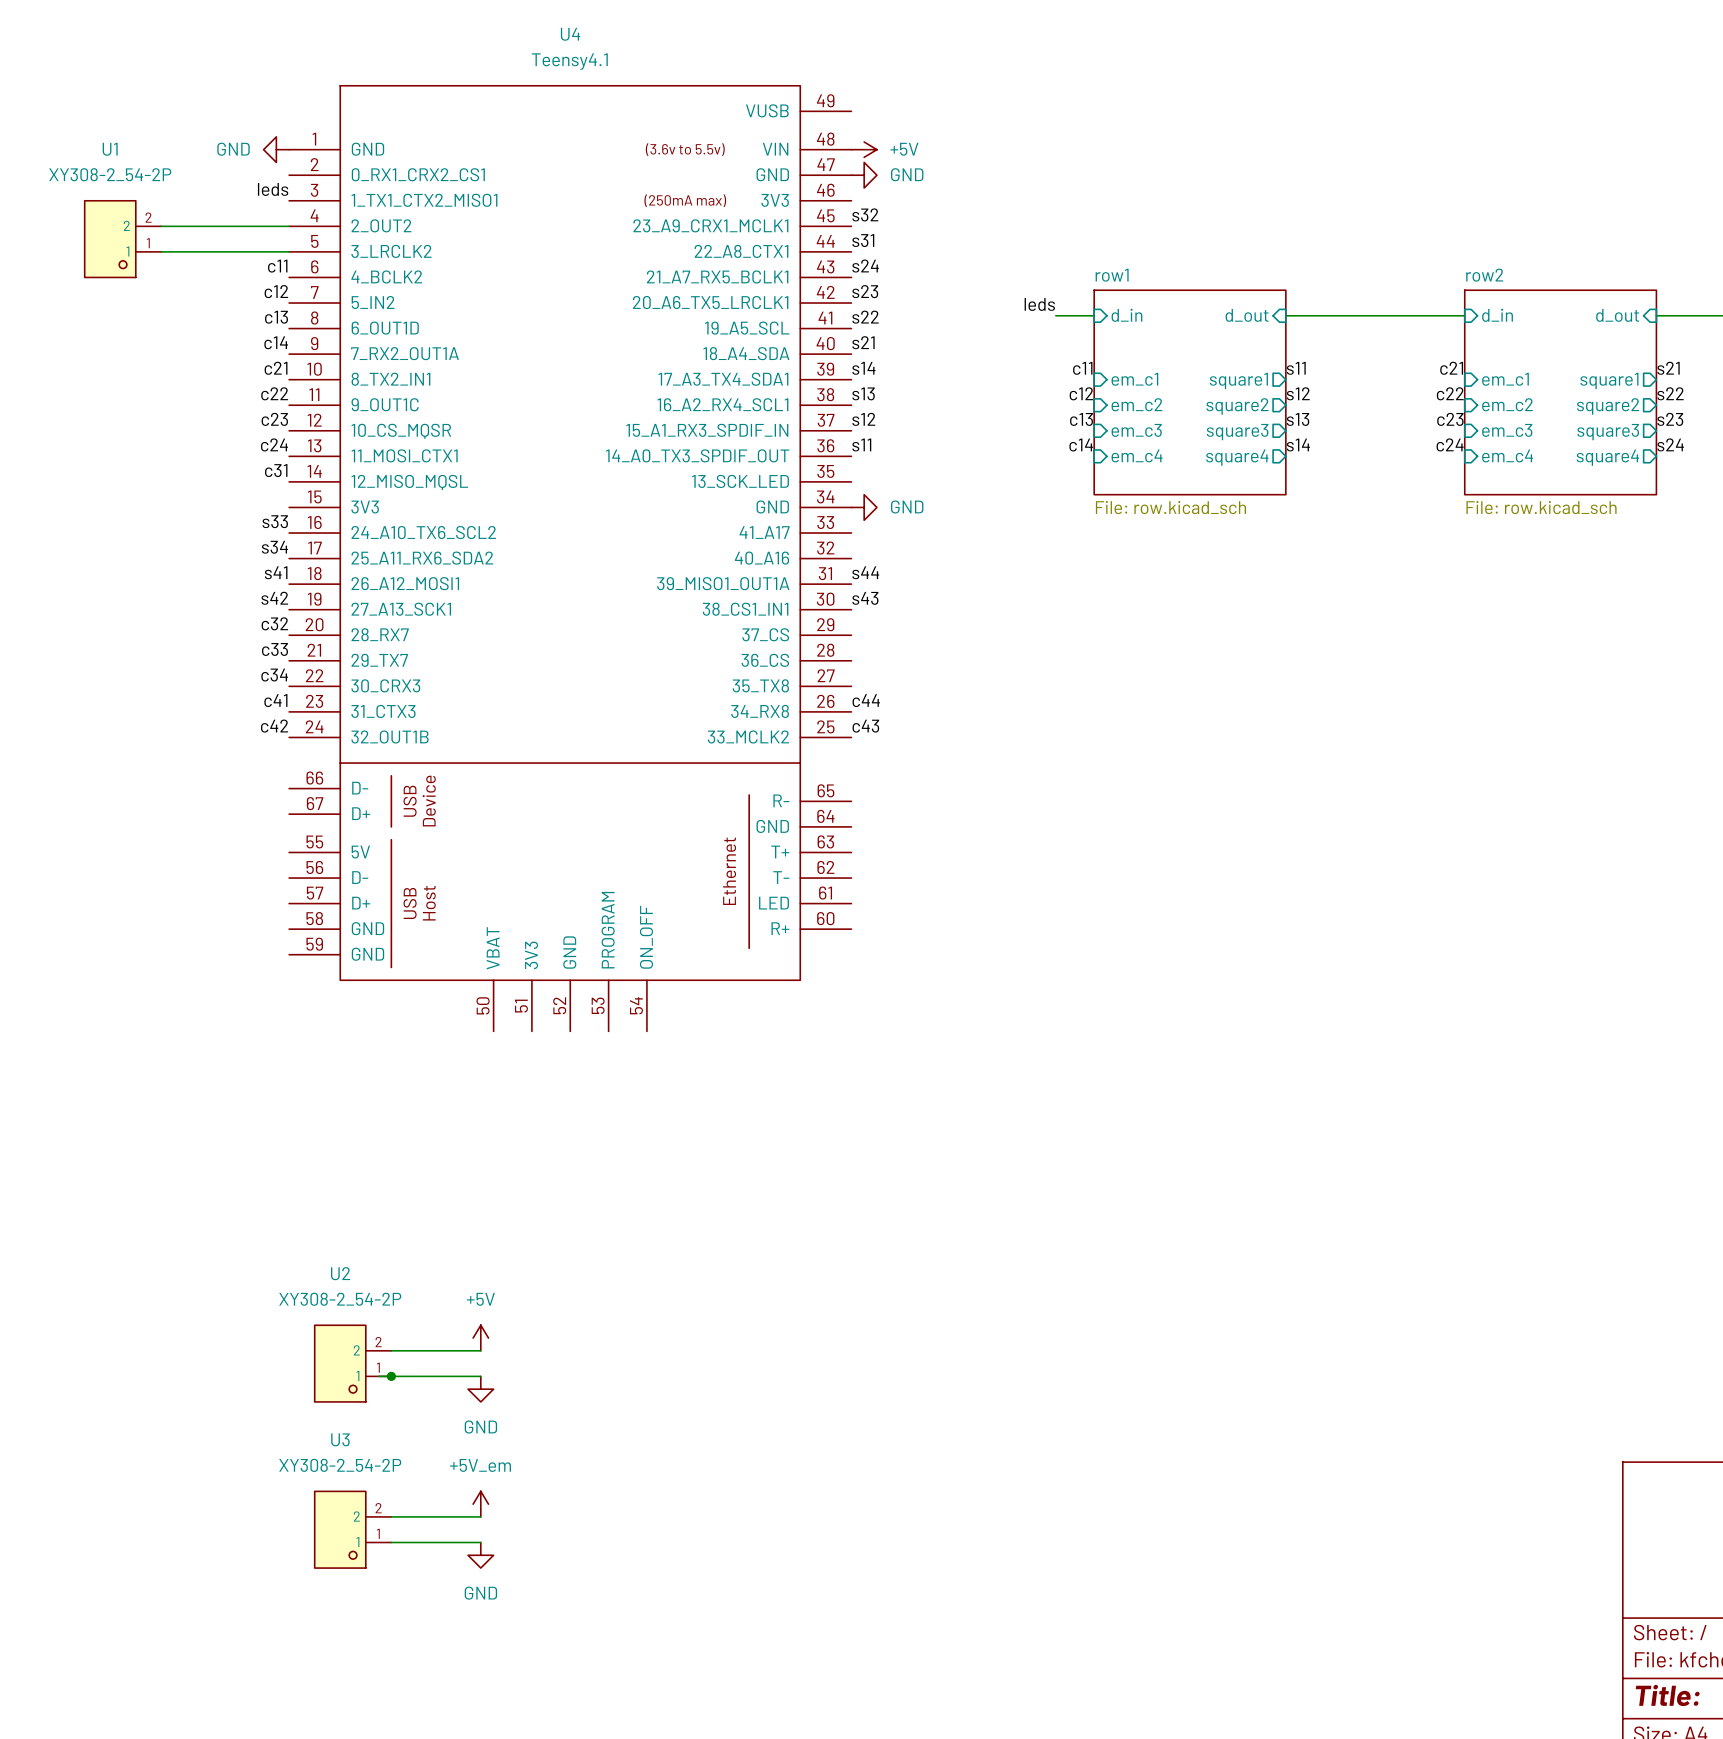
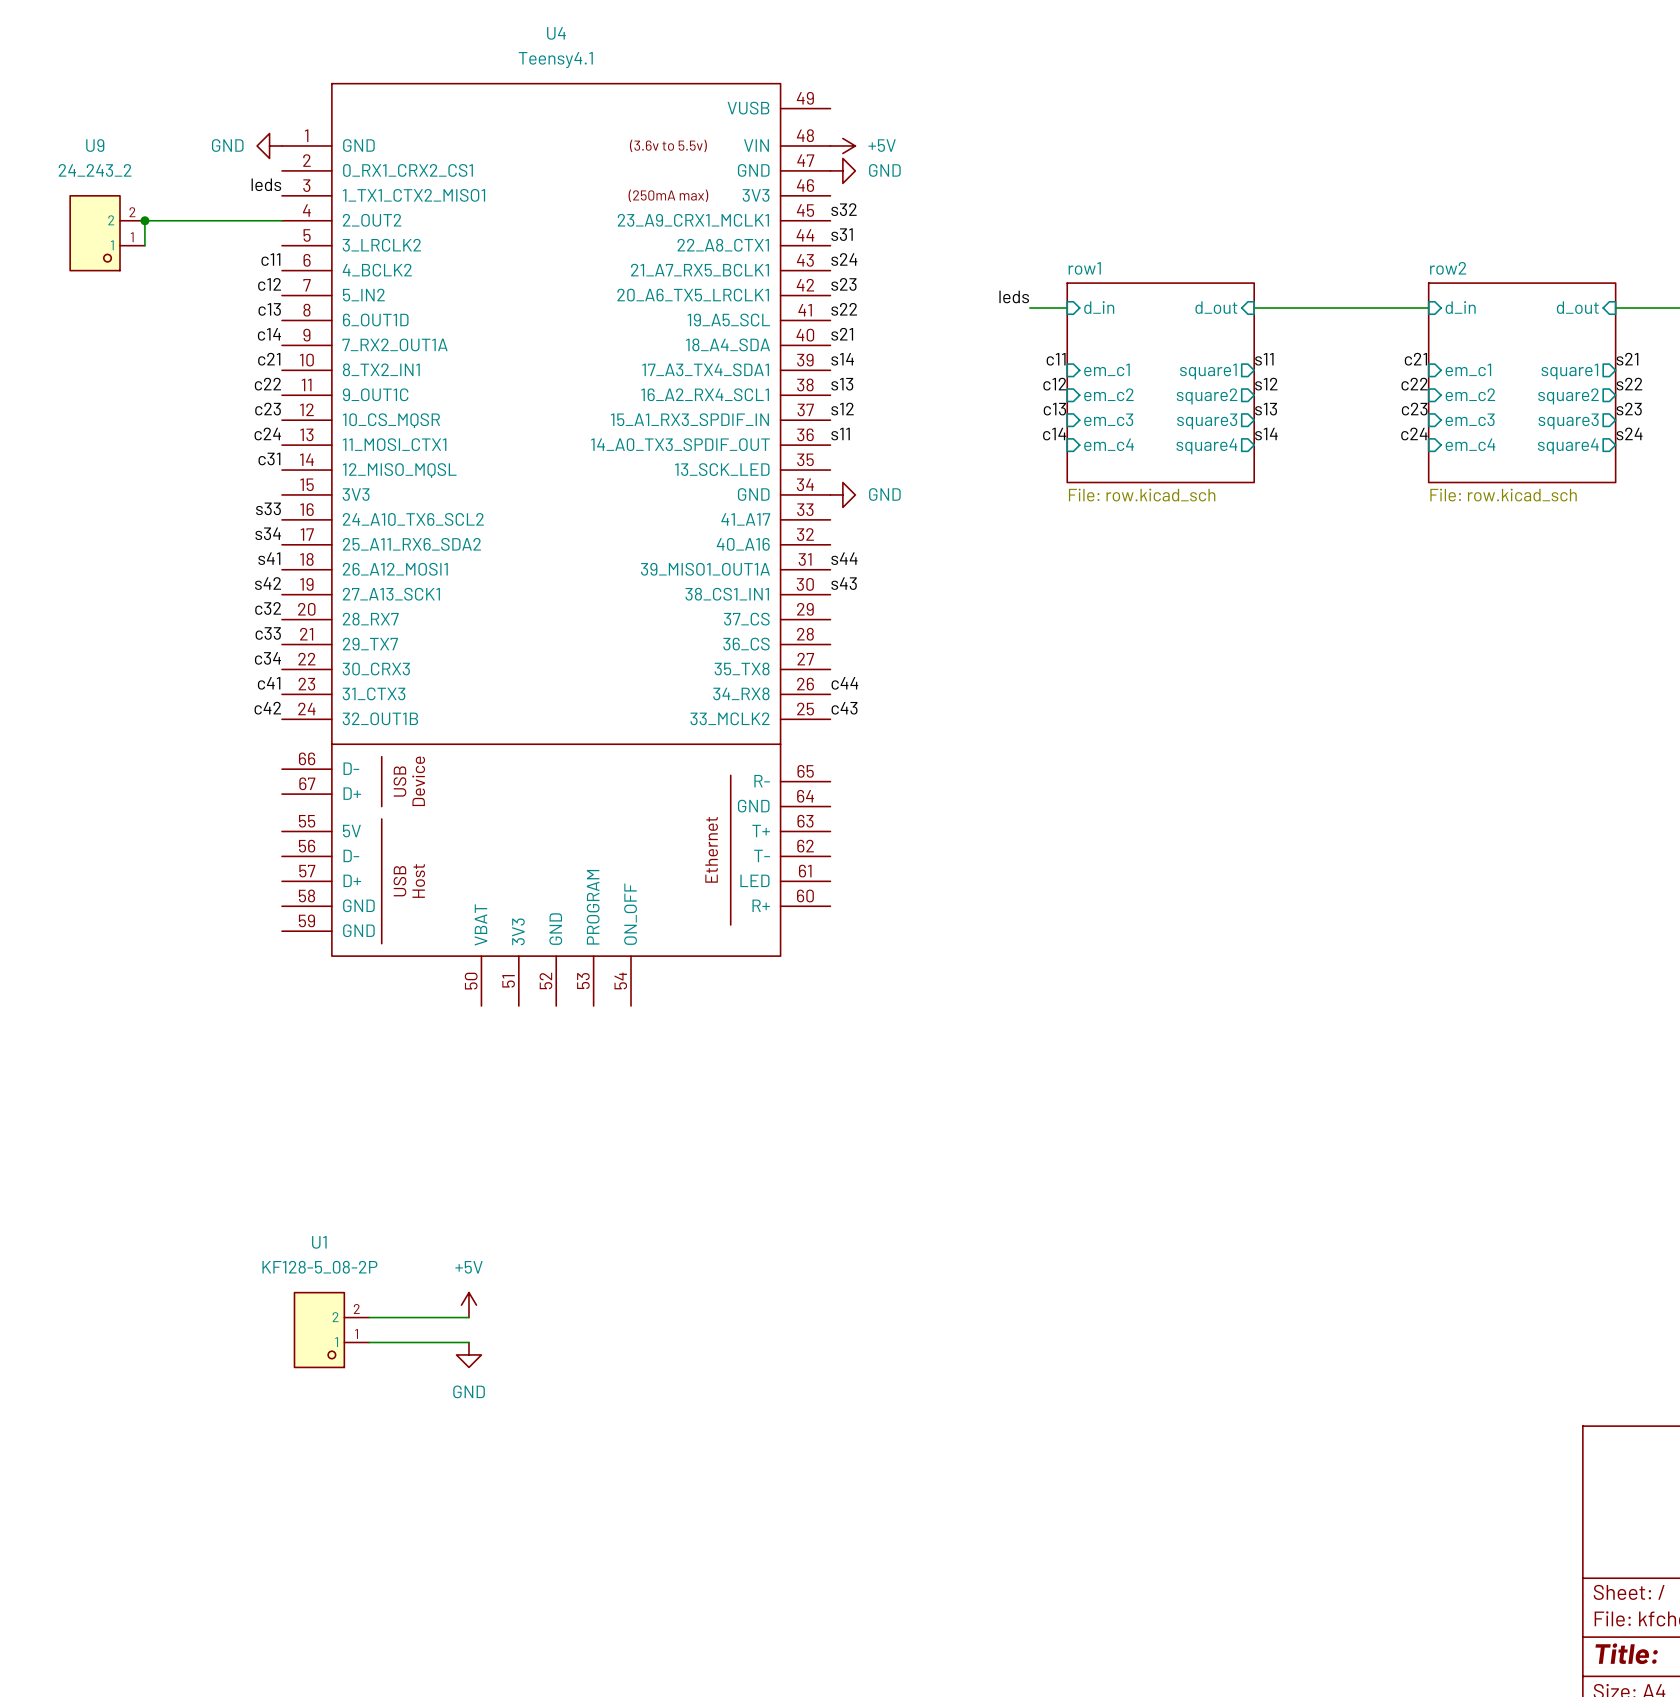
U1 value: XY308-2_54-2P (110, 174) -> KF128-5_08-2P (319, 1267)
junction: none -> (144, 220)
U9: none -> 24_243_2 (107, 233)
U1 position: (123, 239) -> (331, 1330)
wire: (161, 251) (289, 251) -> none
U2: XY308-2_54-2P (353, 1363) -> none
junction: (391, 1376) -> none
power symbol: +5V_em (480, 1504) -> none
wire: (391, 1516) (480, 1516) -> none
U3: XY308-2_54-2P (353, 1529) -> none
wire: (391, 1542) (480, 1542) -> none
power symbol: GND (480, 1555) -> none

